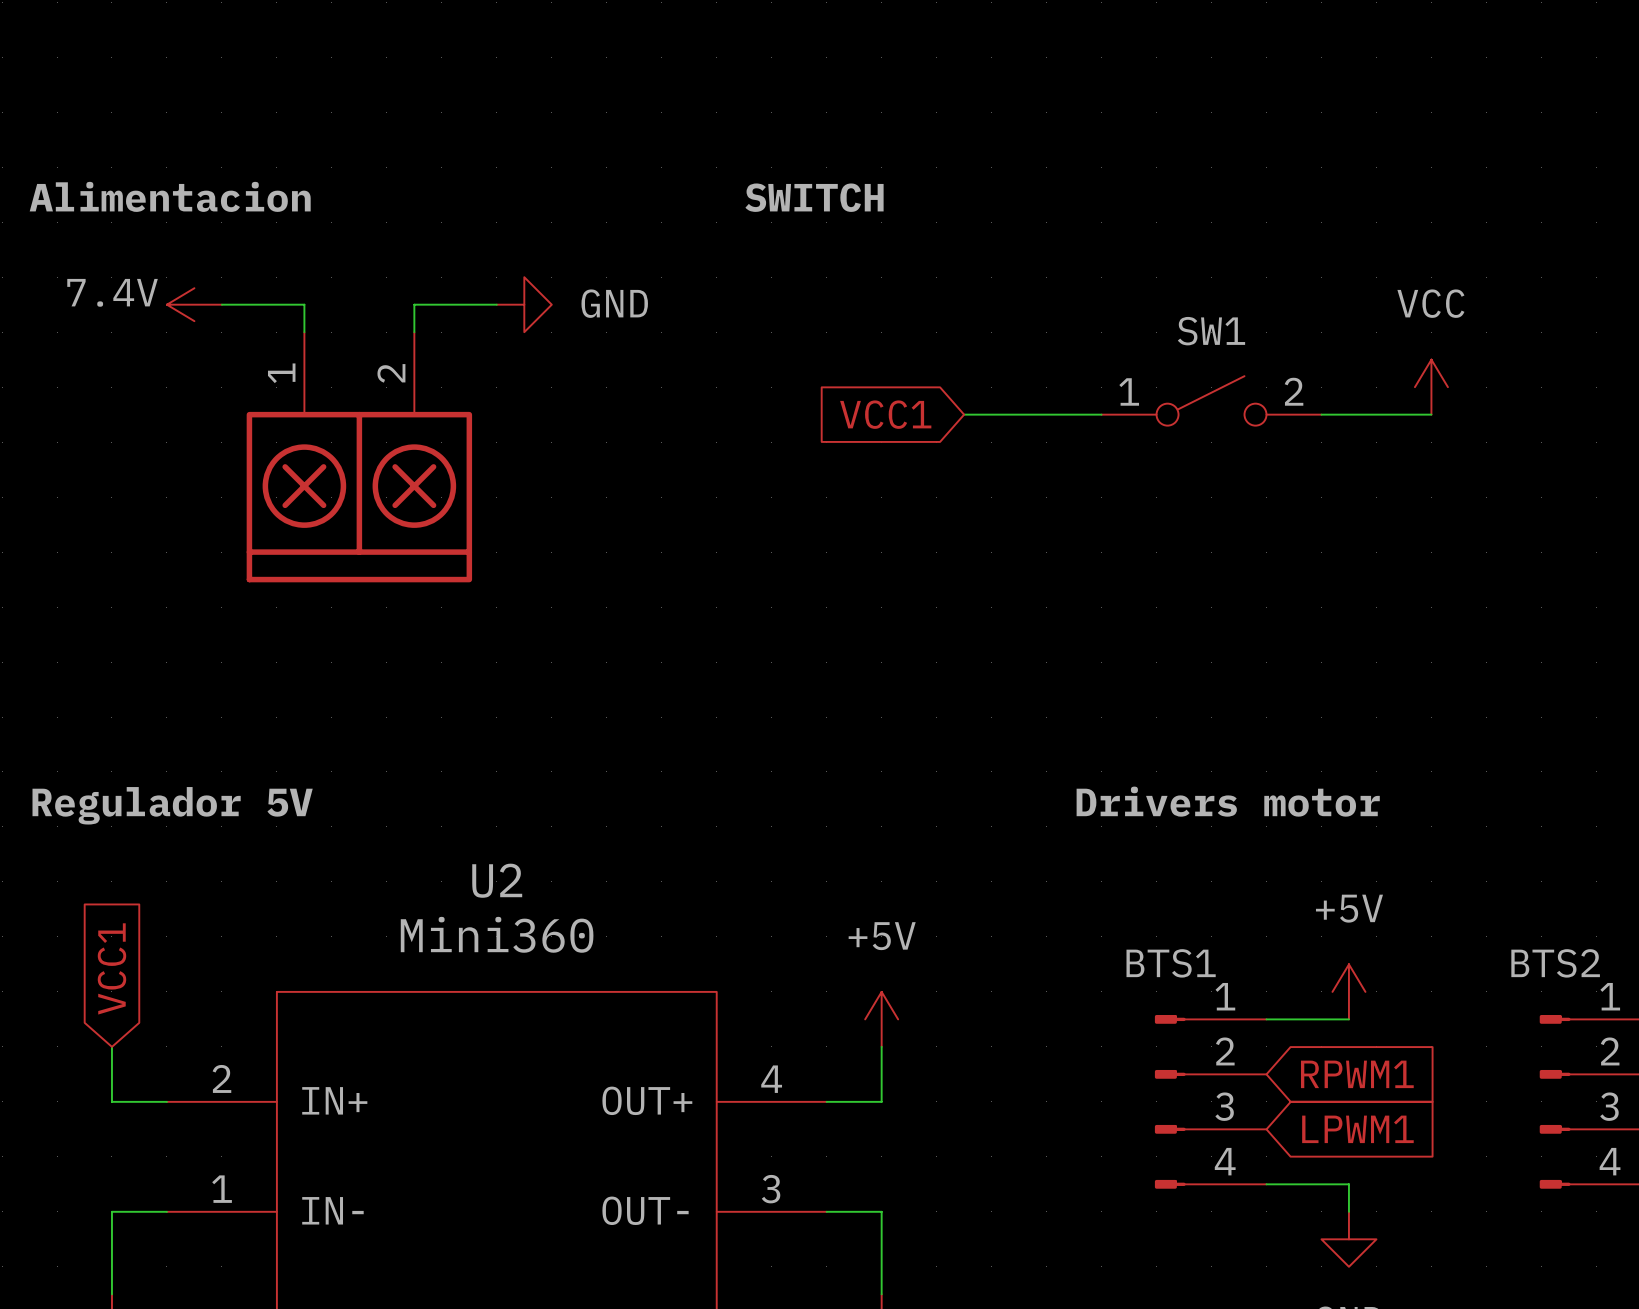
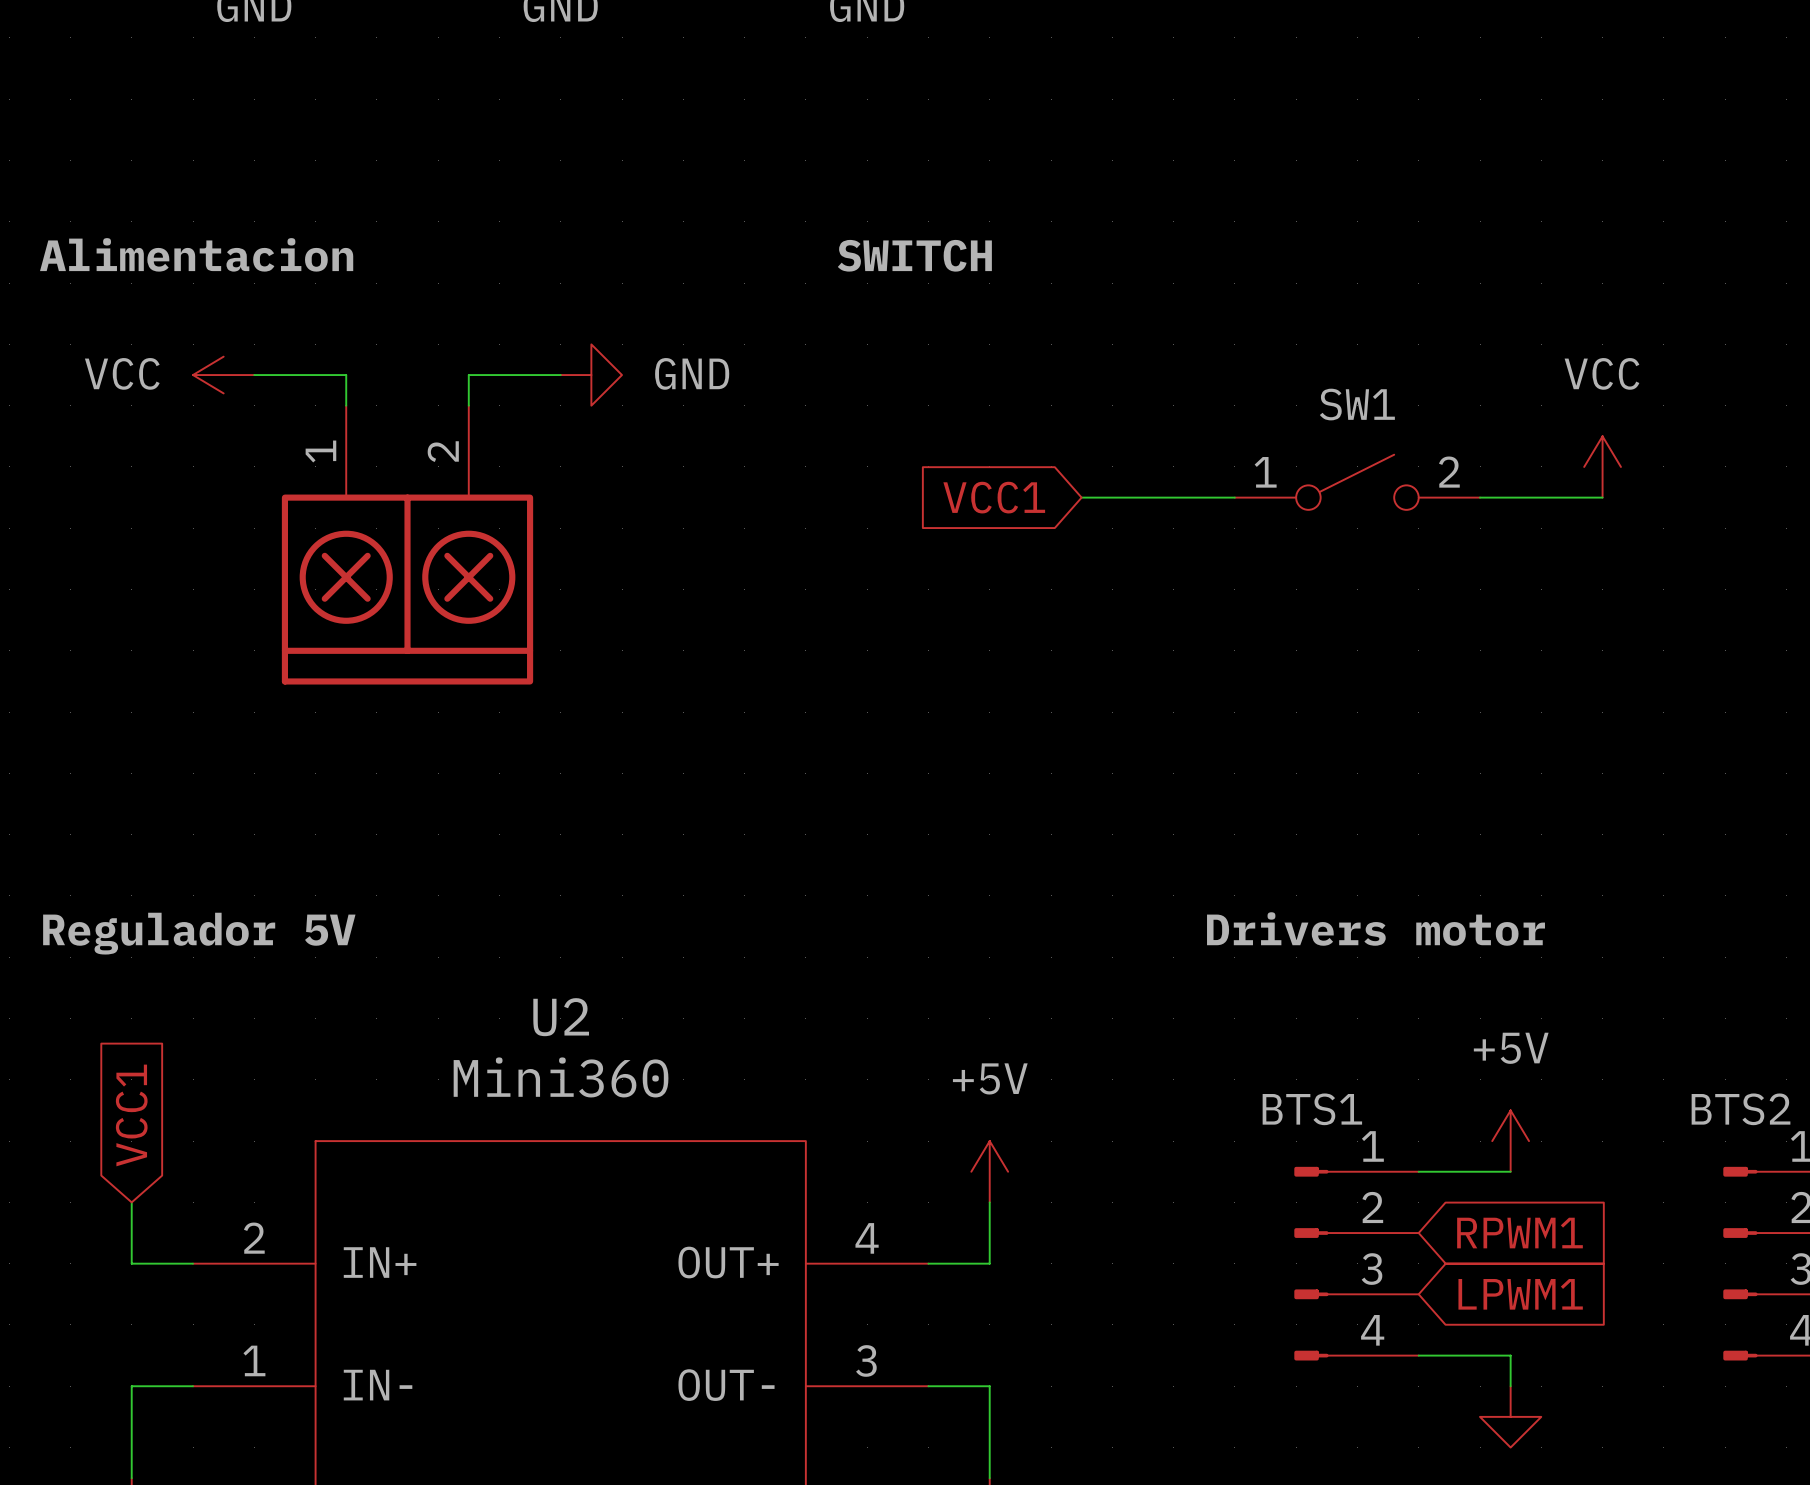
power symbol: 7.4V (194, 304) -> VCC (223, 375)

